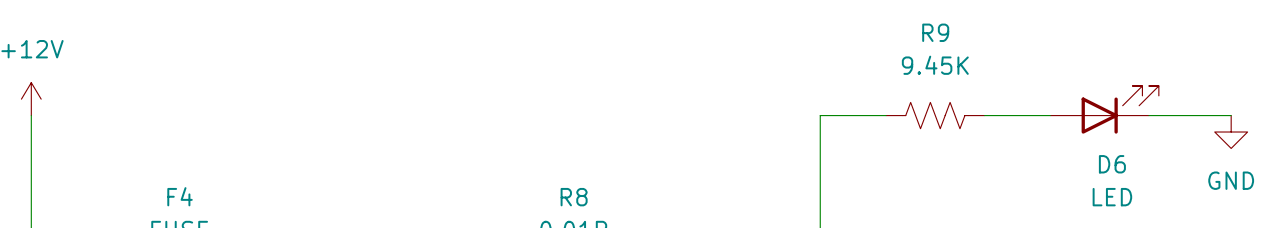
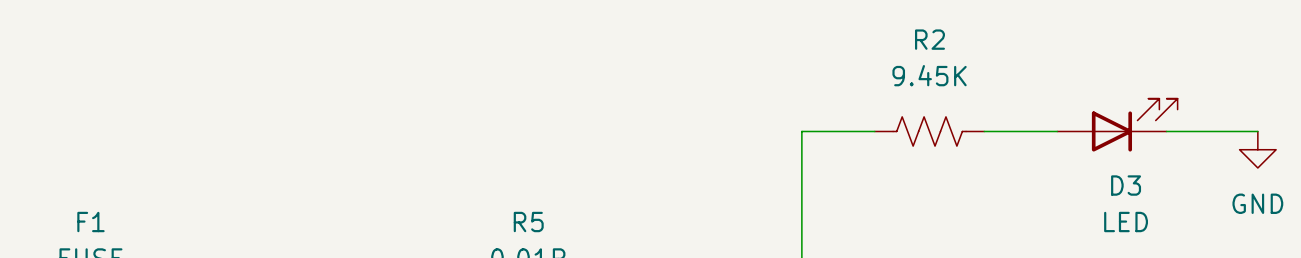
R9 name: R9 (935, 32) -> R2 (929, 39)
D6 name: D6 (1112, 164) -> D3 (1126, 185)
F4 name: F4 (180, 196) -> F1 (90, 222)
R8 name: R8 (574, 197) -> R5 (528, 222)

